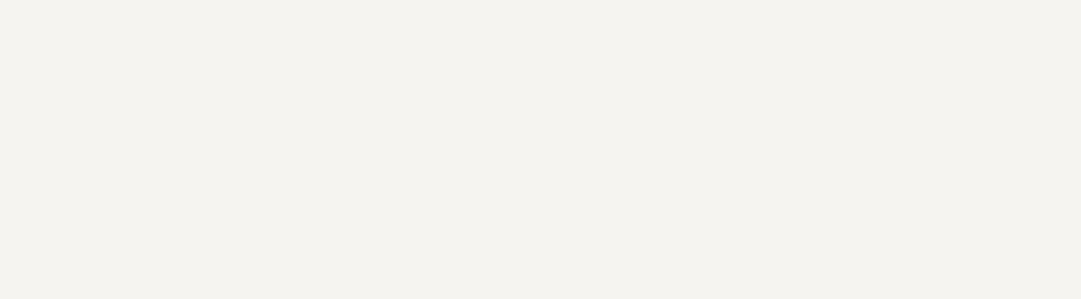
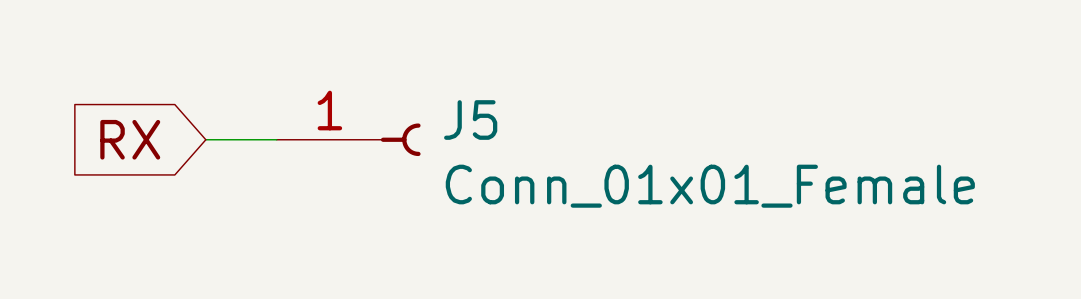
global label: none -> RX (130, 139)
wire: none -> (205, 139) (276, 139)
J5: none -> Conn_01x01_Female (348, 139)

